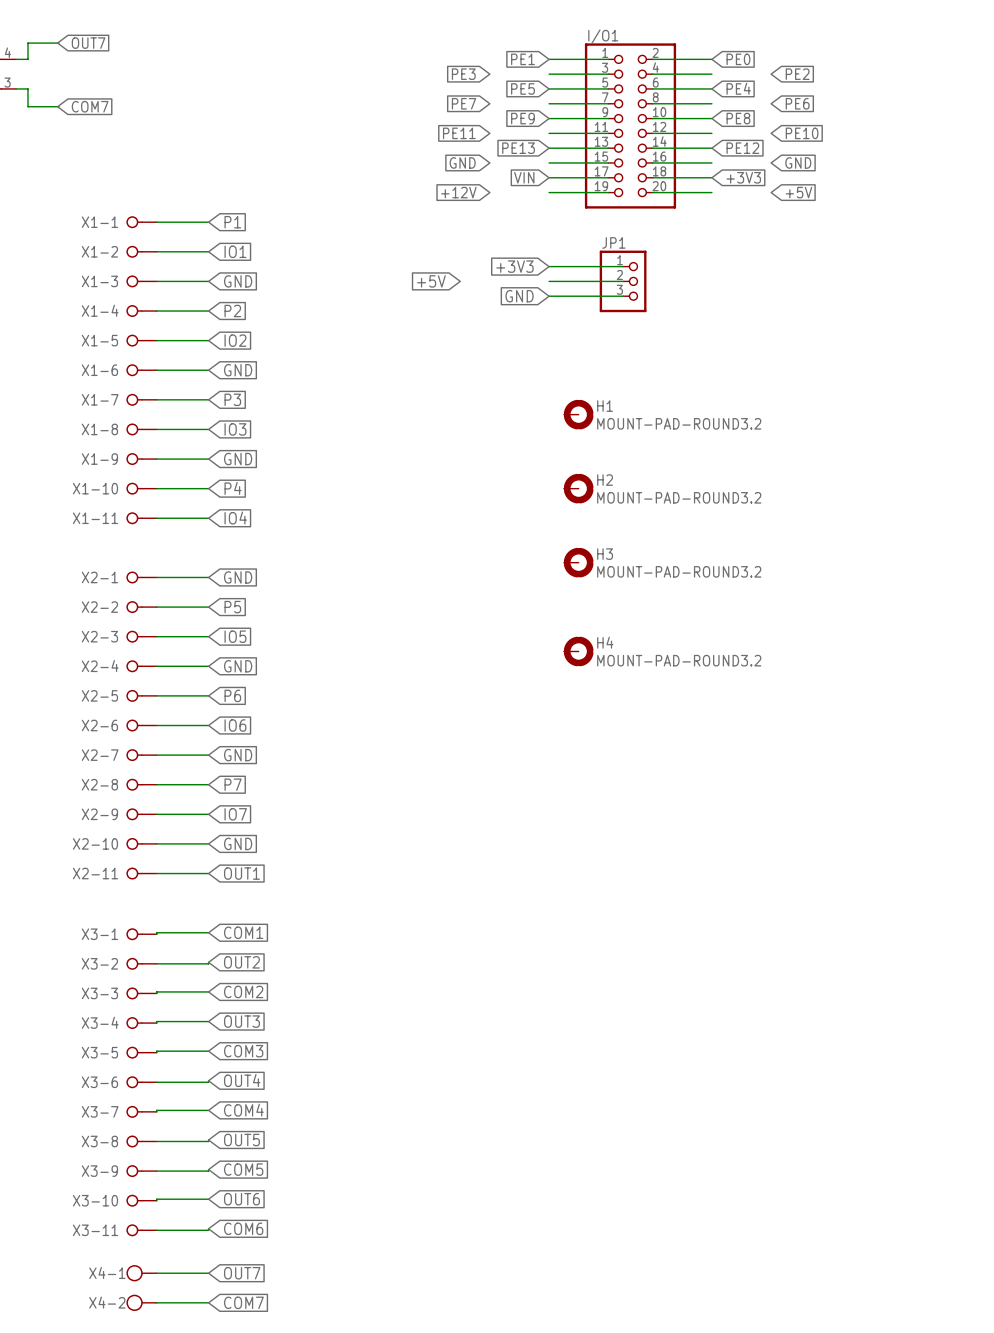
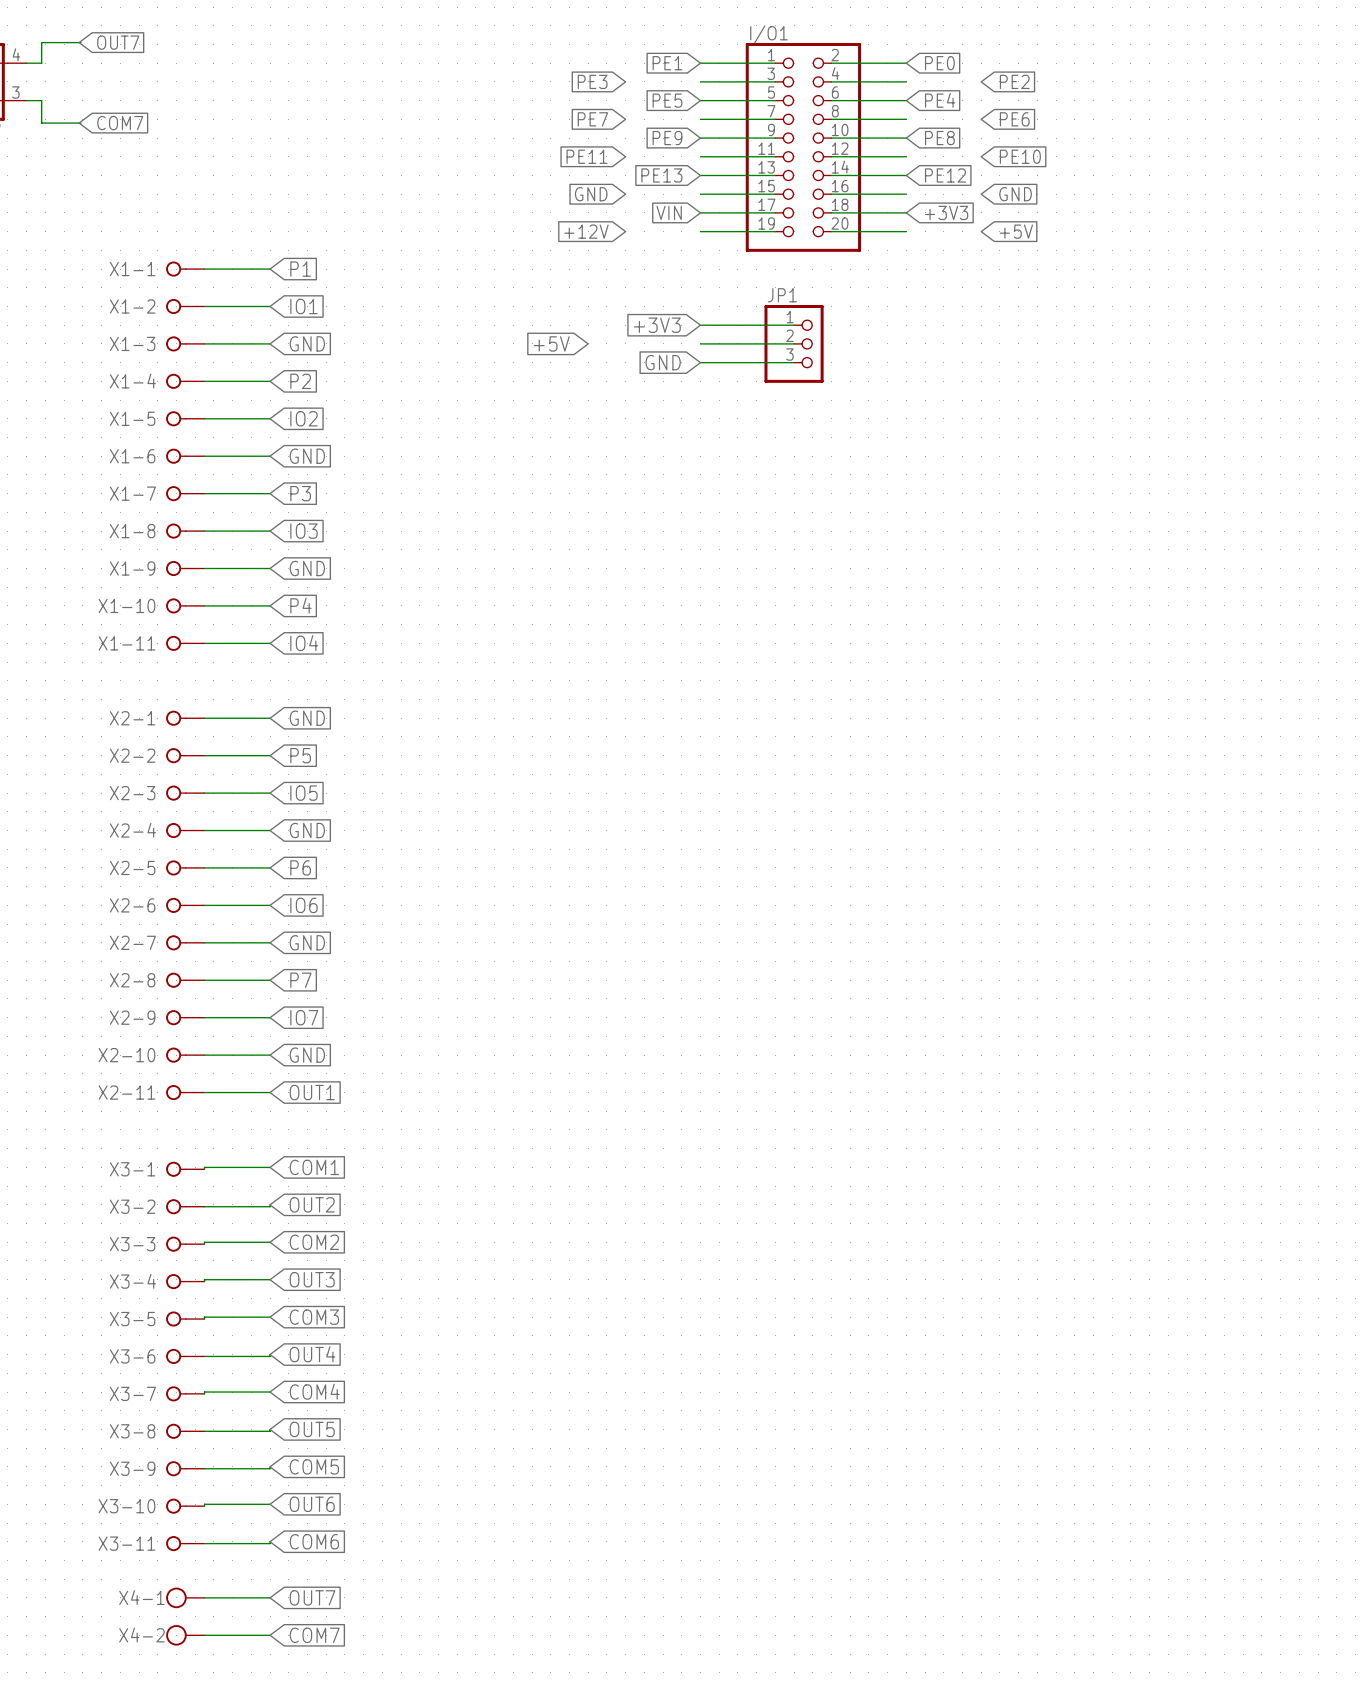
H1: MOUNT-PAD-ROUND3.2 (578, 414) -> none
H2: MOUNT-PAD-ROUND3.2 (578, 488) -> none
H3: MOUNT-PAD-ROUND3.2 (578, 562) -> none
H4: MOUNT-PAD-ROUND3.2 (578, 651) -> none

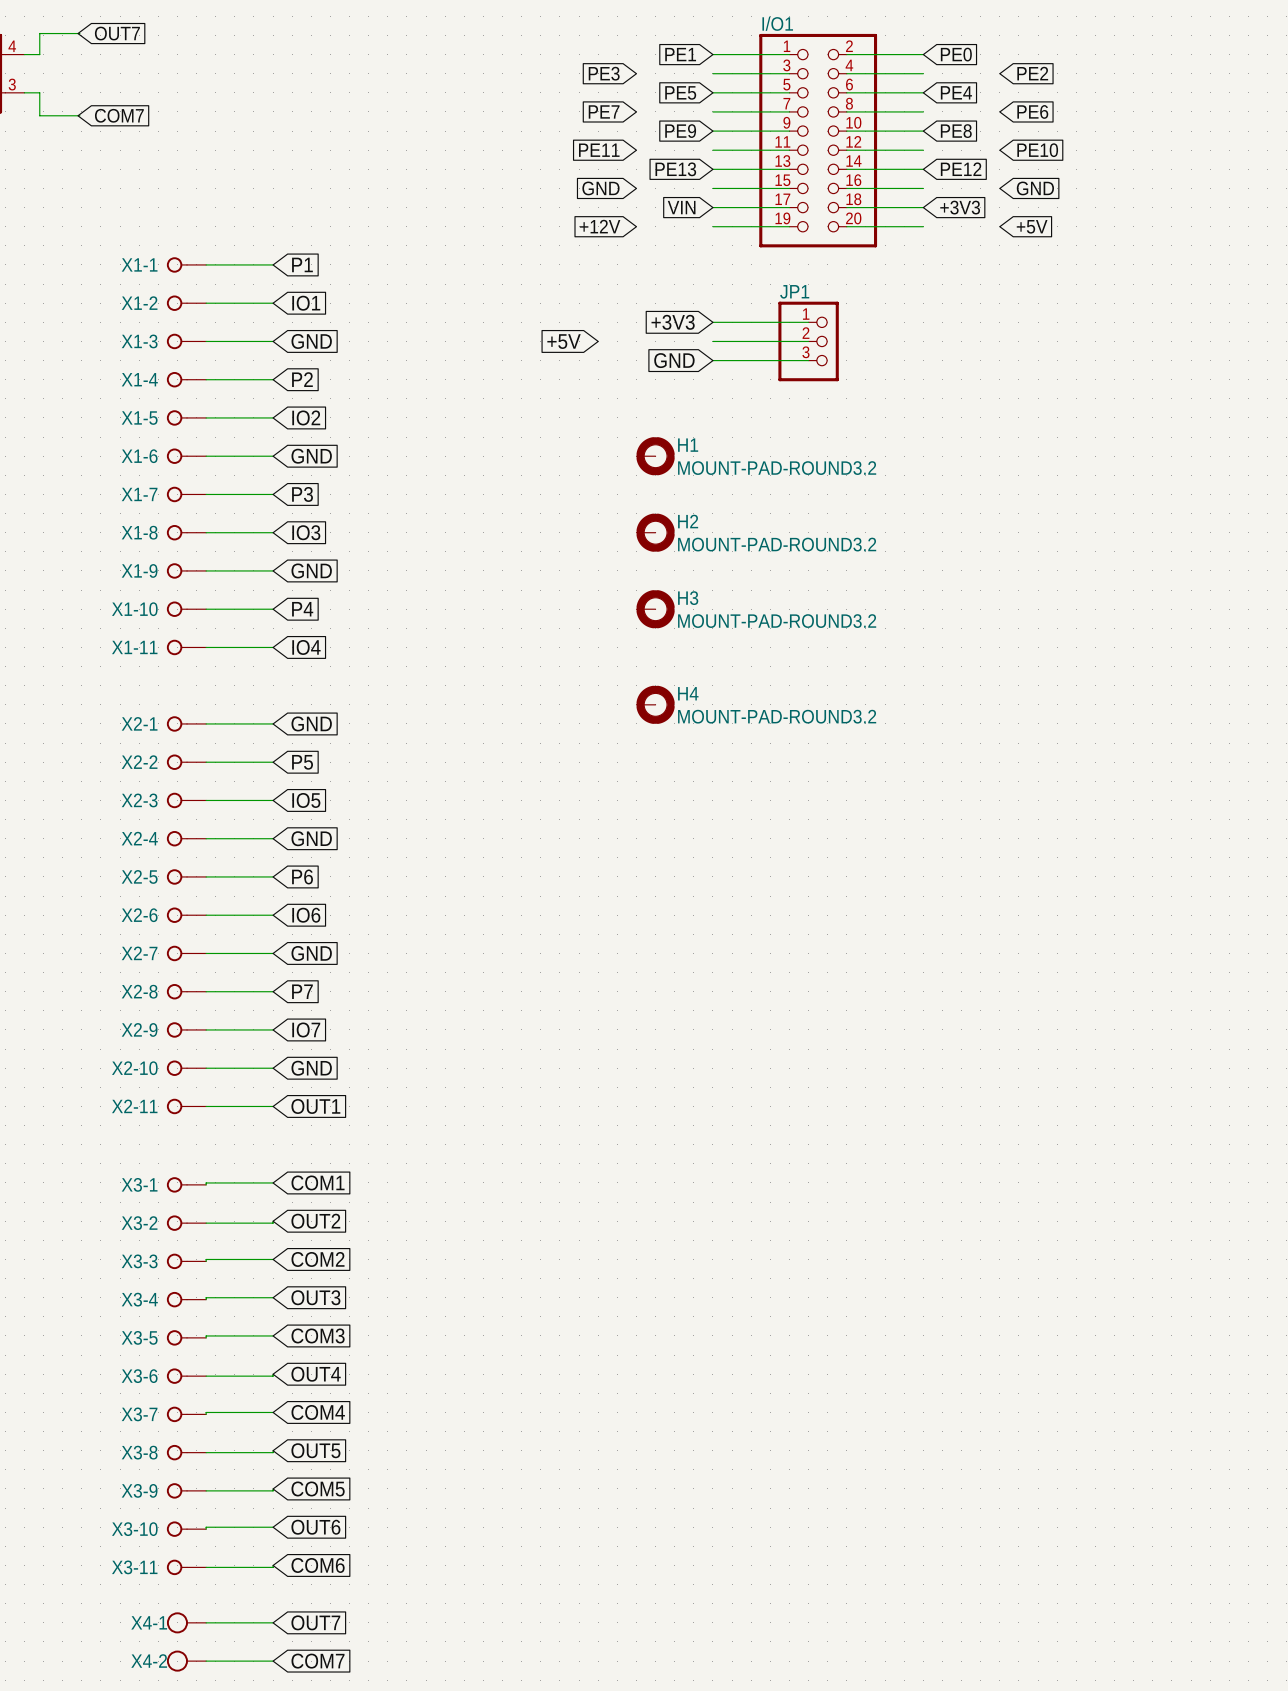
H1: none -> MOUNT-PAD-ROUND3.2 (655, 456)
H2: none -> MOUNT-PAD-ROUND3.2 (655, 532)
H3: none -> MOUNT-PAD-ROUND3.2 (655, 609)
H4: none -> MOUNT-PAD-ROUND3.2 (655, 704)

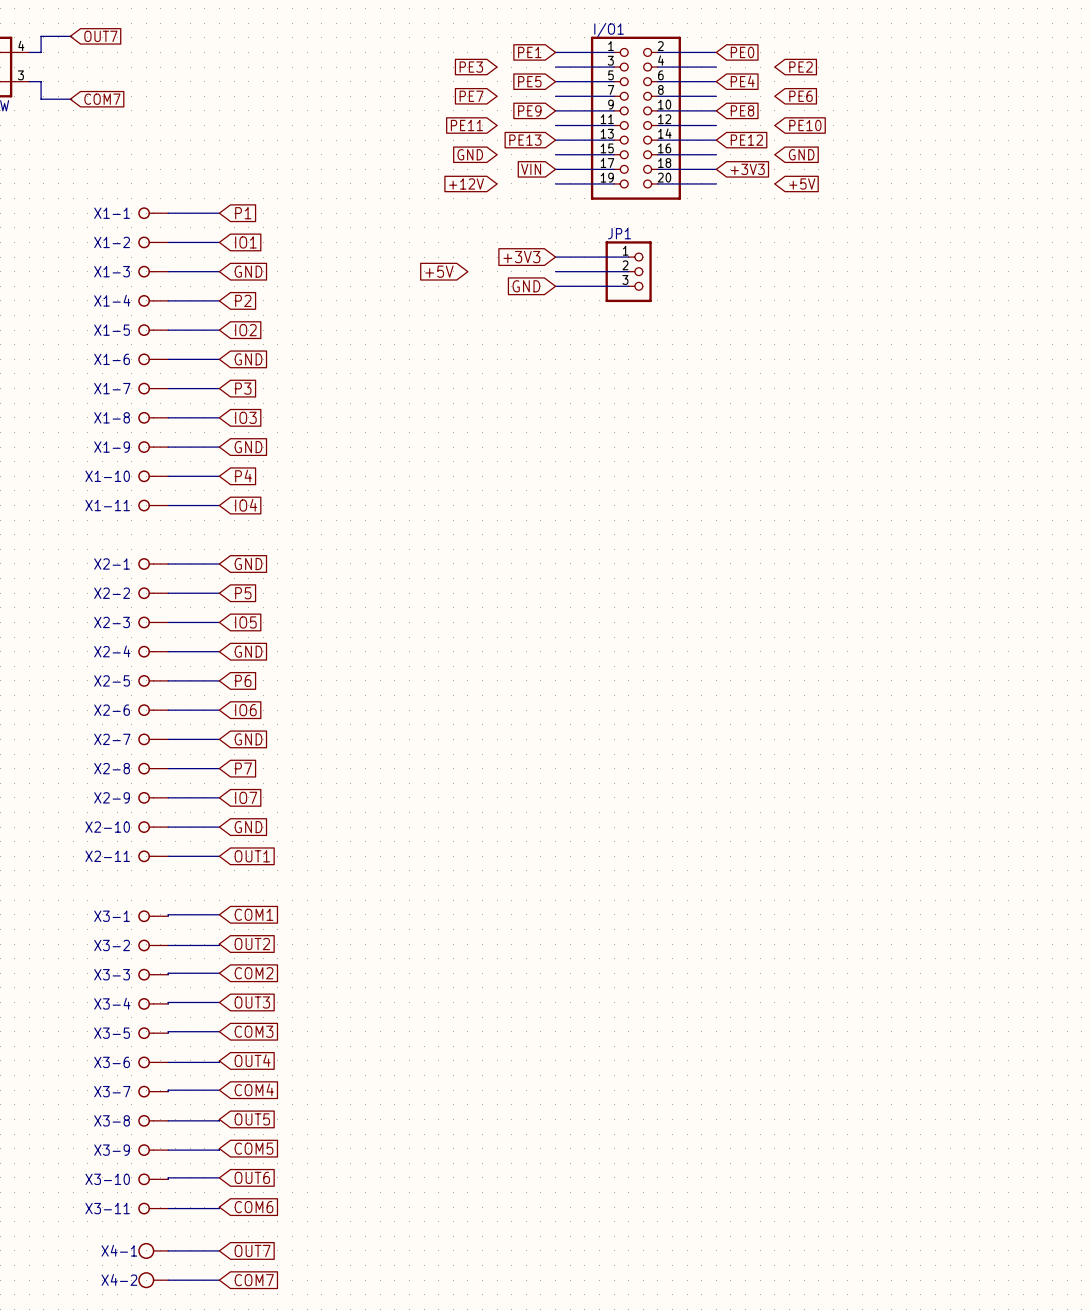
H1: MOUNT-PAD-ROUND3.2 (655, 456) -> none
H2: MOUNT-PAD-ROUND3.2 (655, 532) -> none
H3: MOUNT-PAD-ROUND3.2 (655, 609) -> none
H4: MOUNT-PAD-ROUND3.2 (655, 704) -> none

